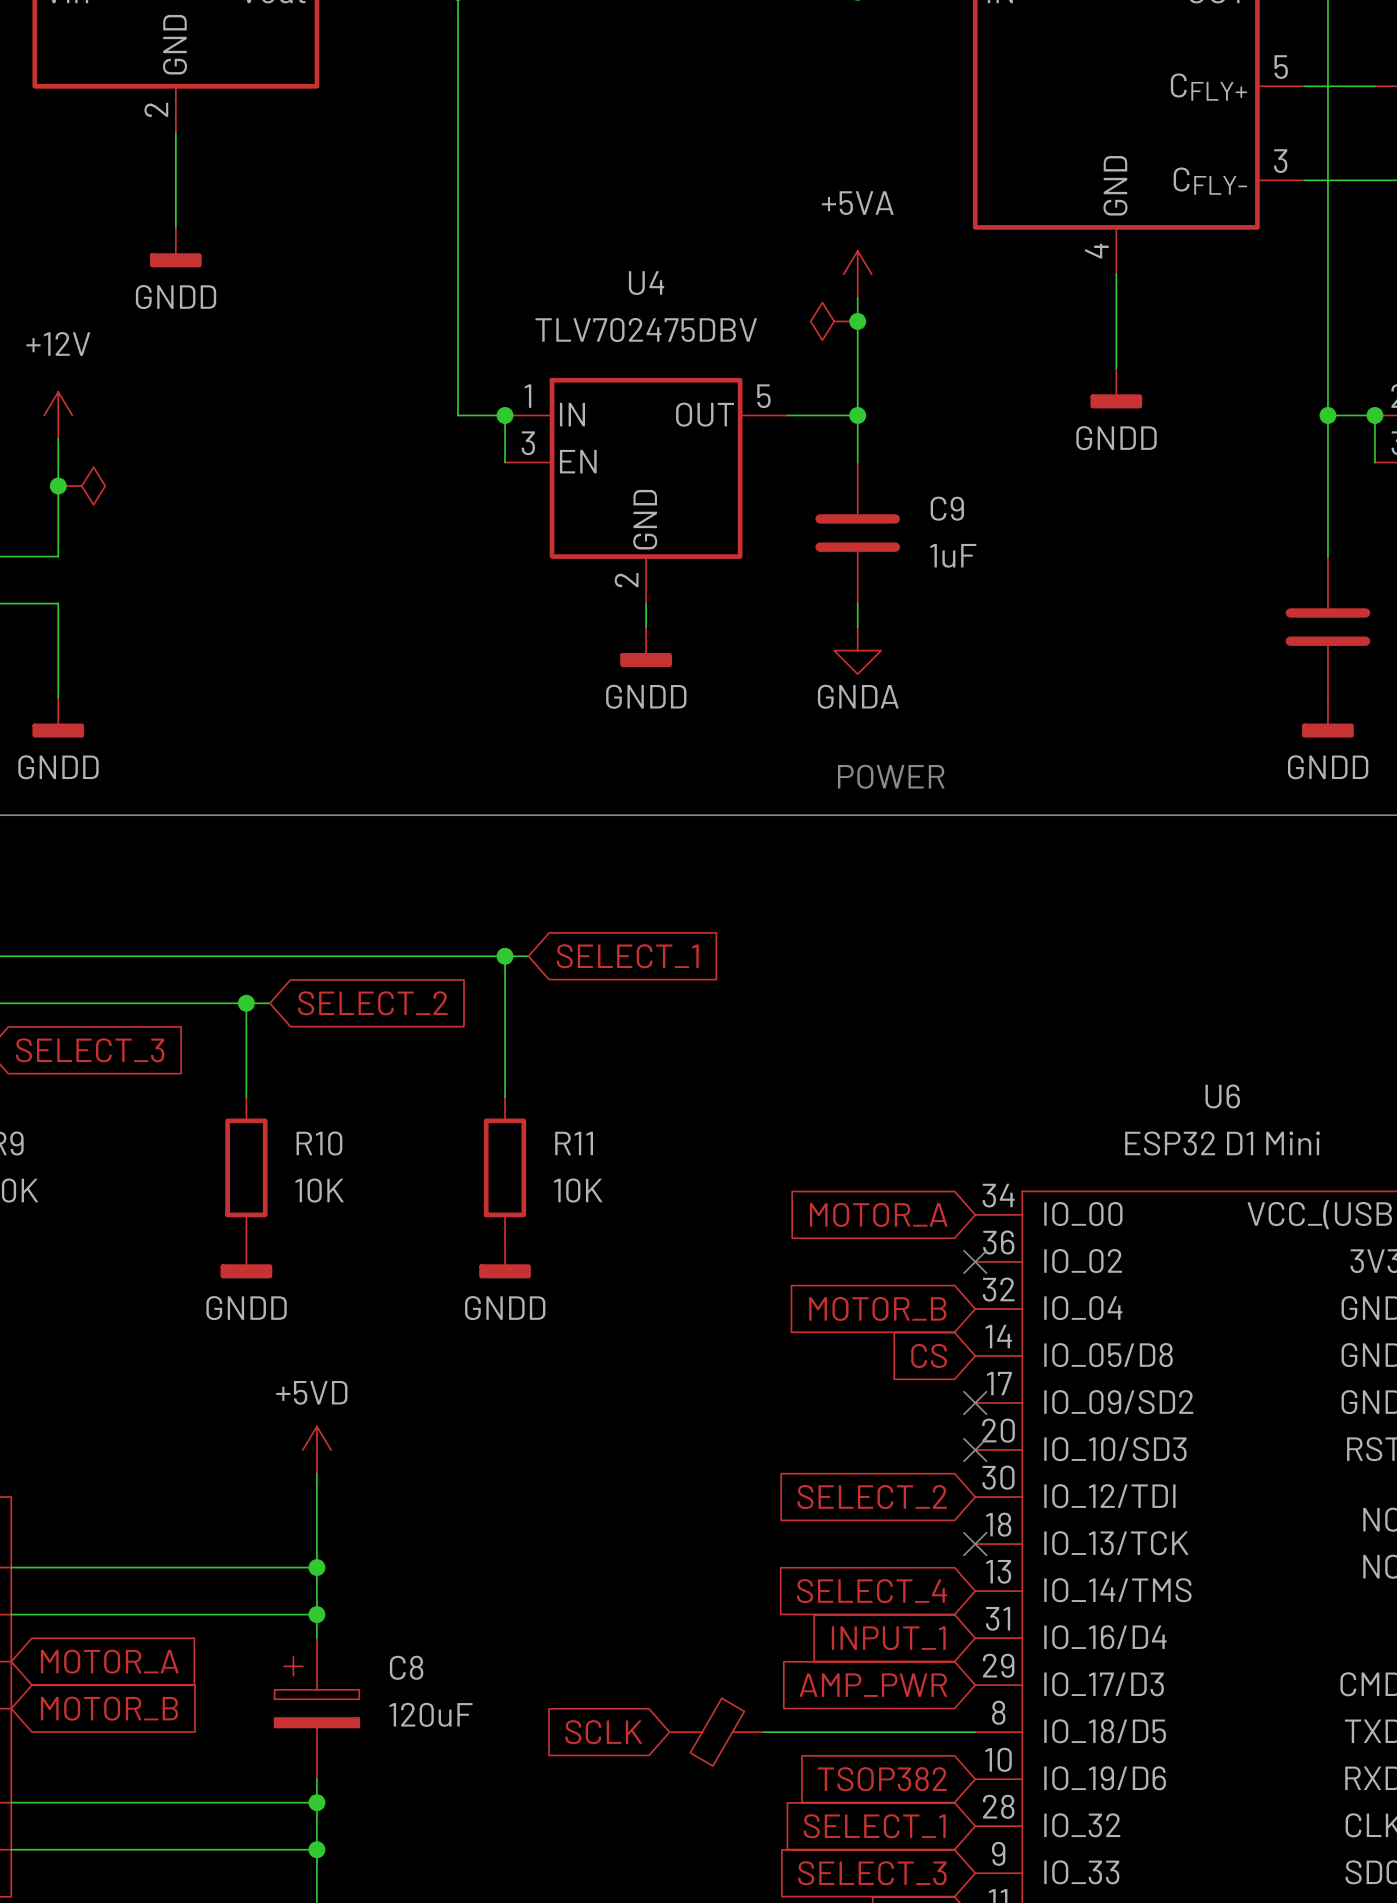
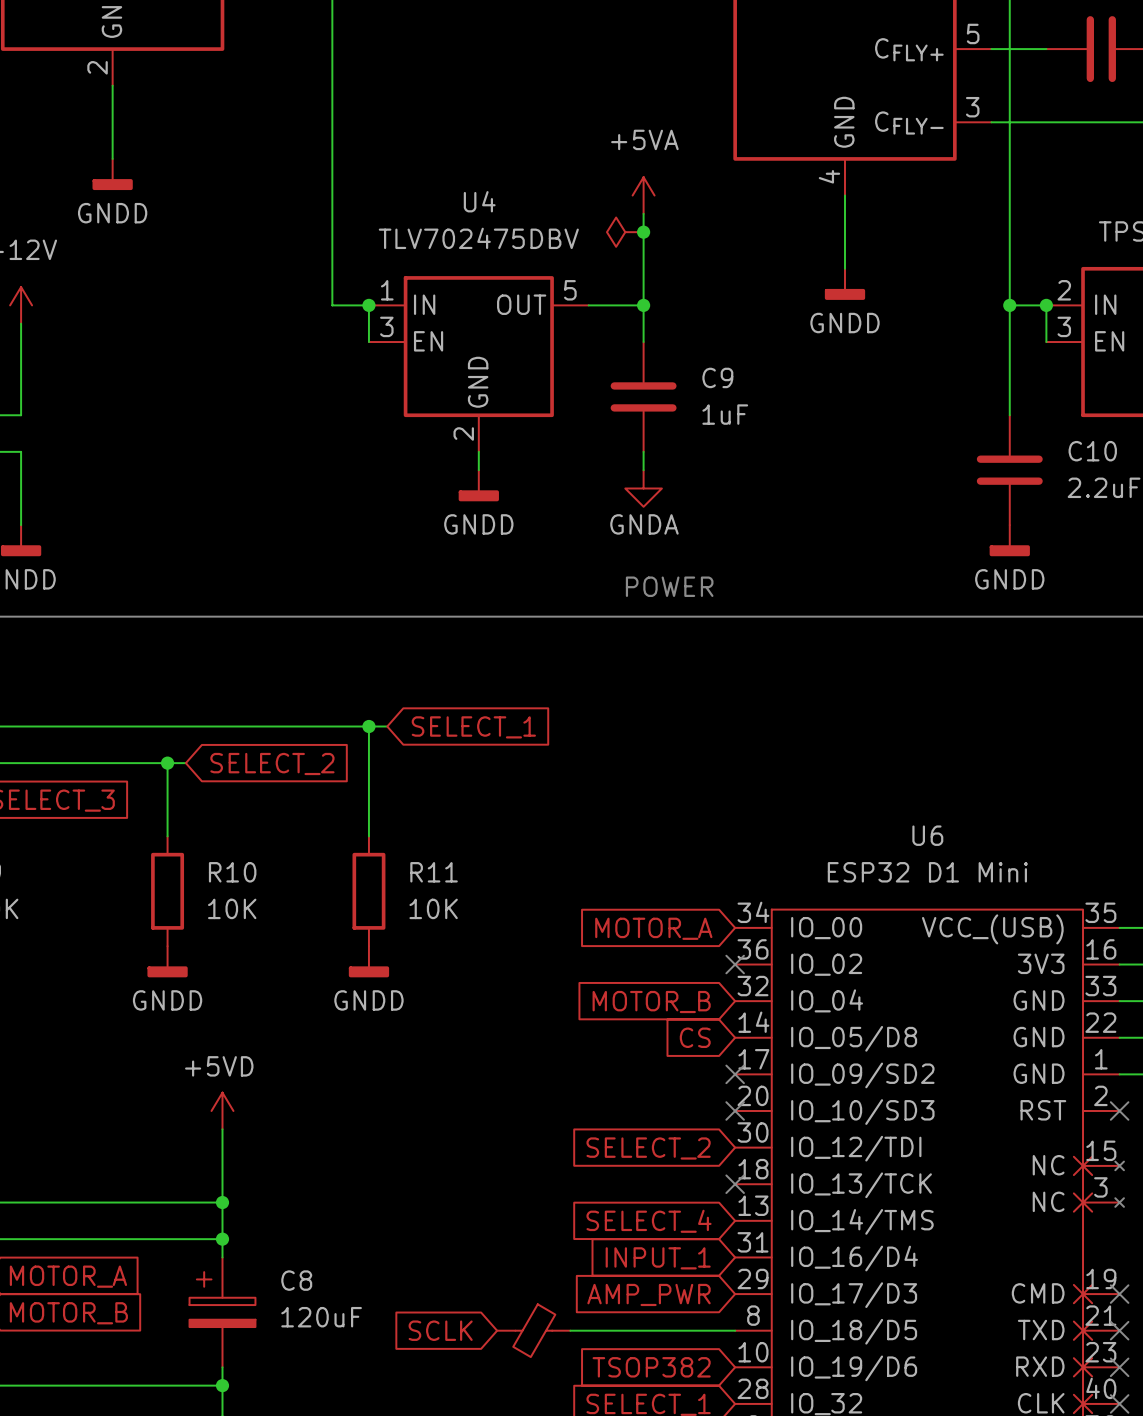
junction: (58, 486) -> none
power symbol: (81, 486) -> none

